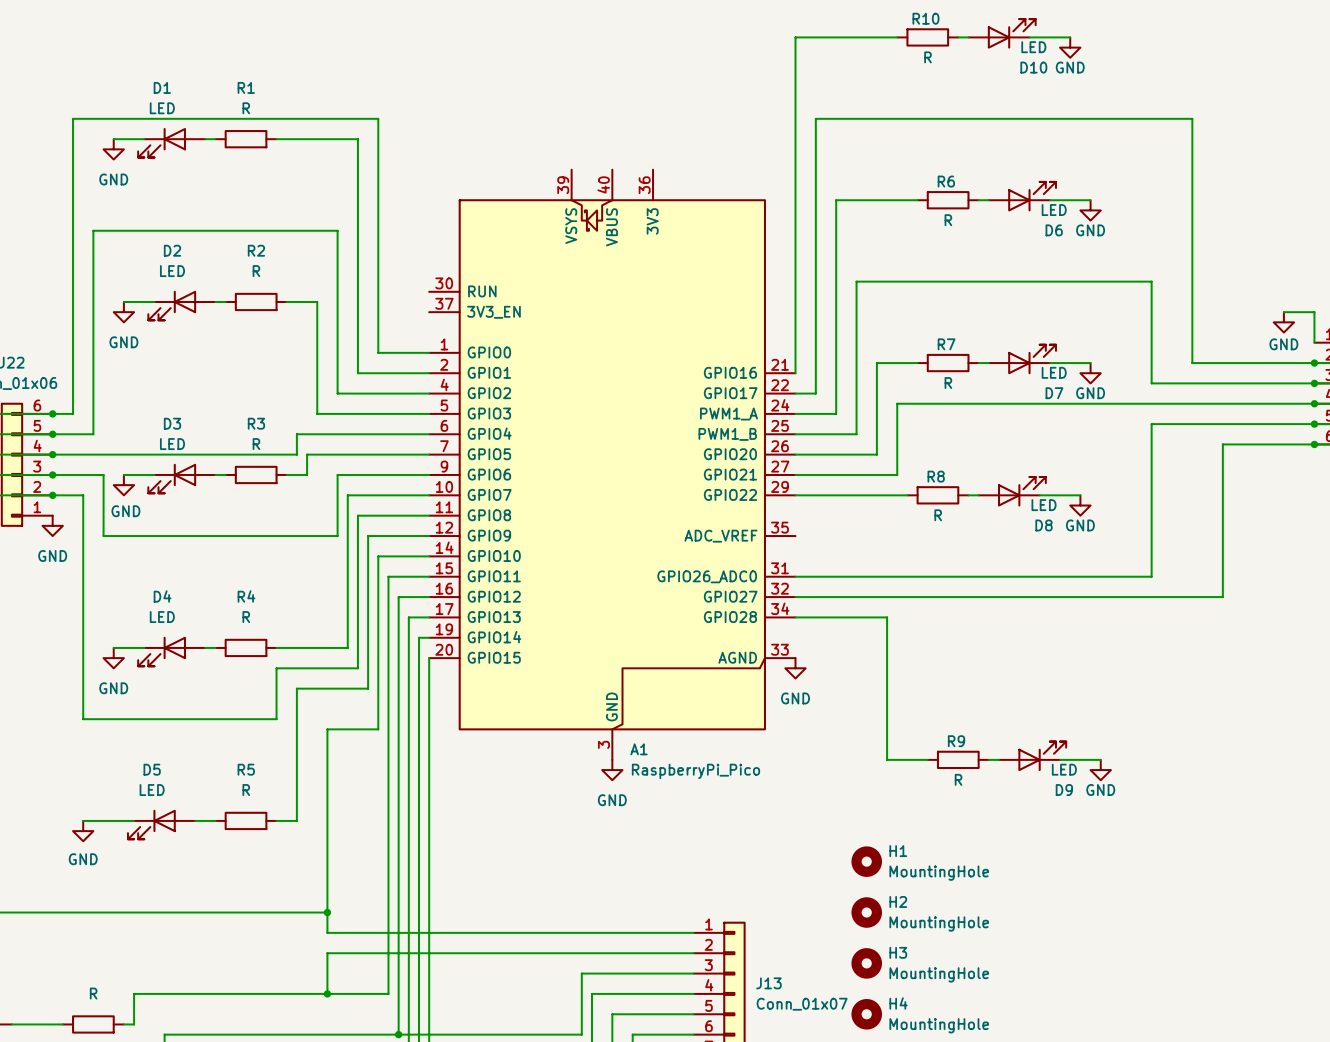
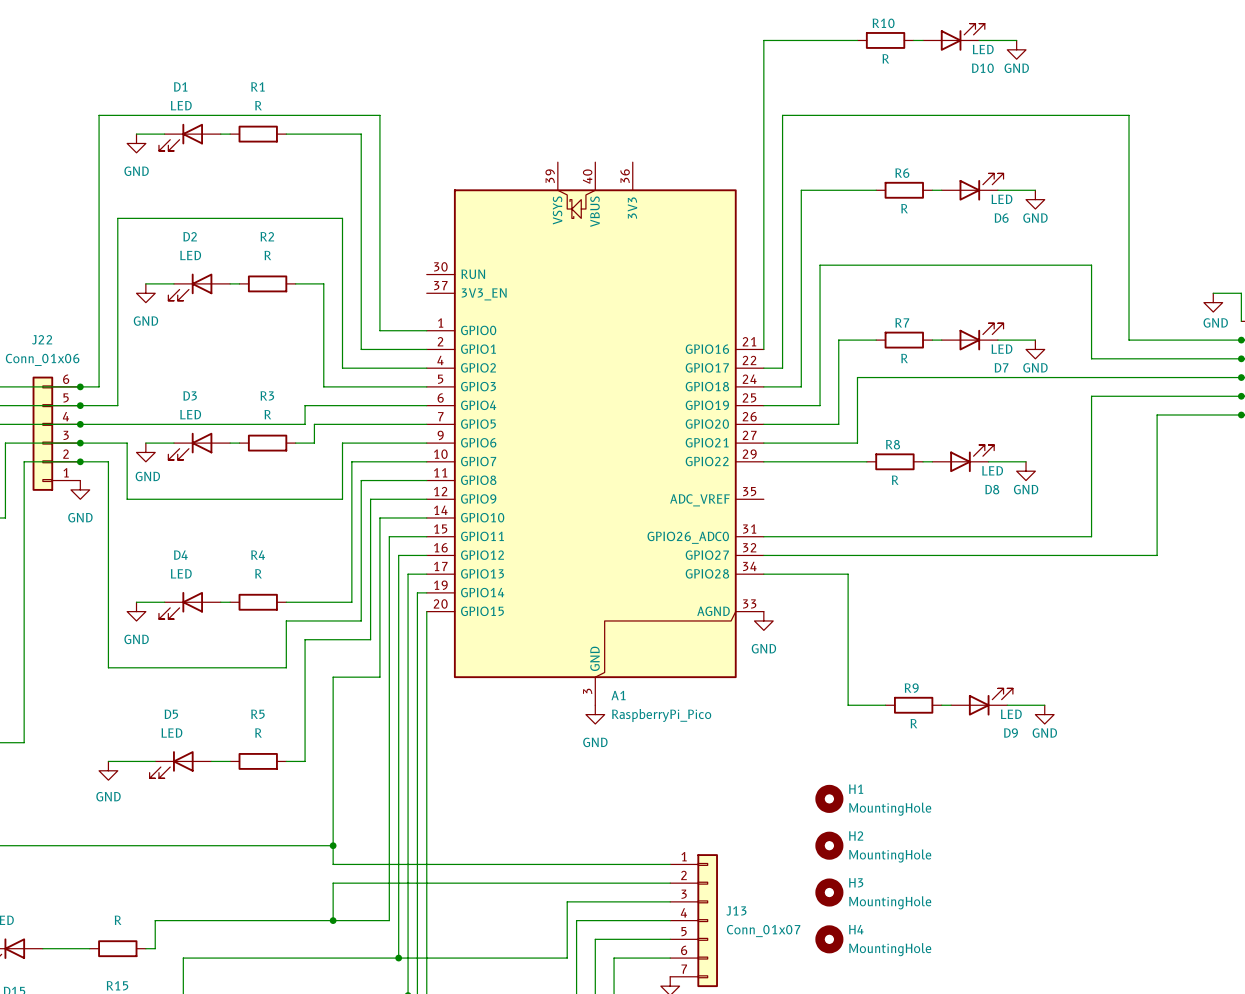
A1 pin name: PWM1_A (728, 414) -> GPIO18 (707, 386)
A1 pin name: PWM1_B (727, 434) -> GPIO19 (707, 405)

